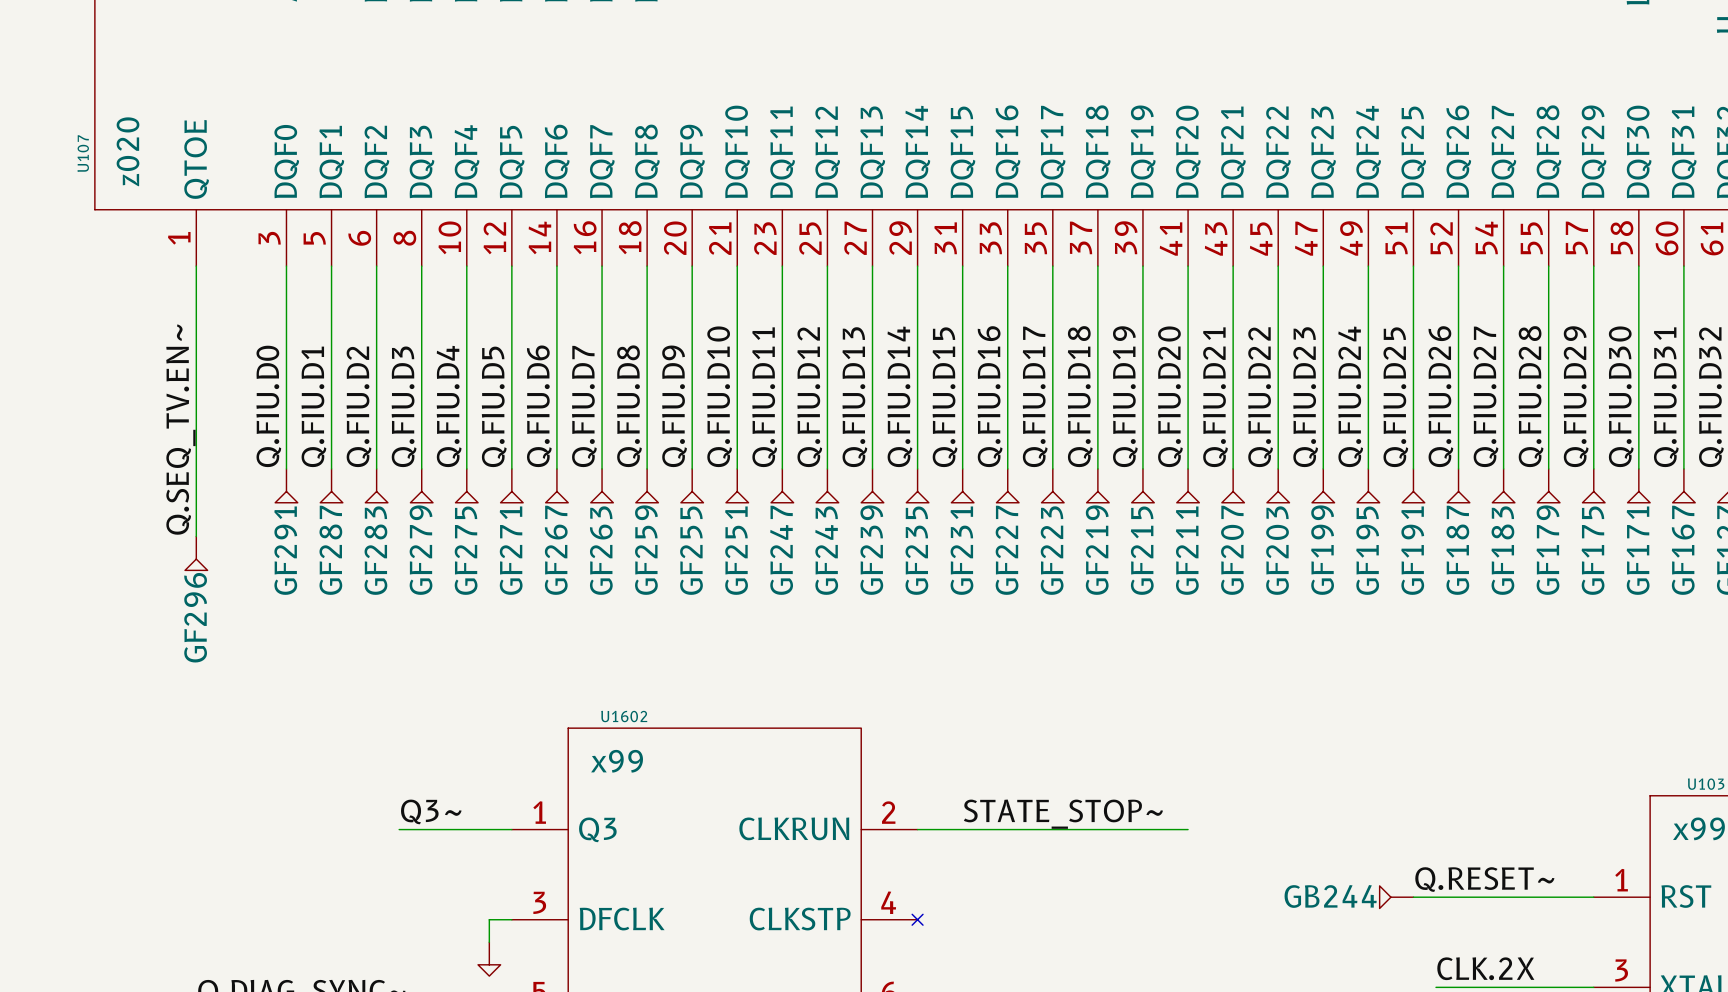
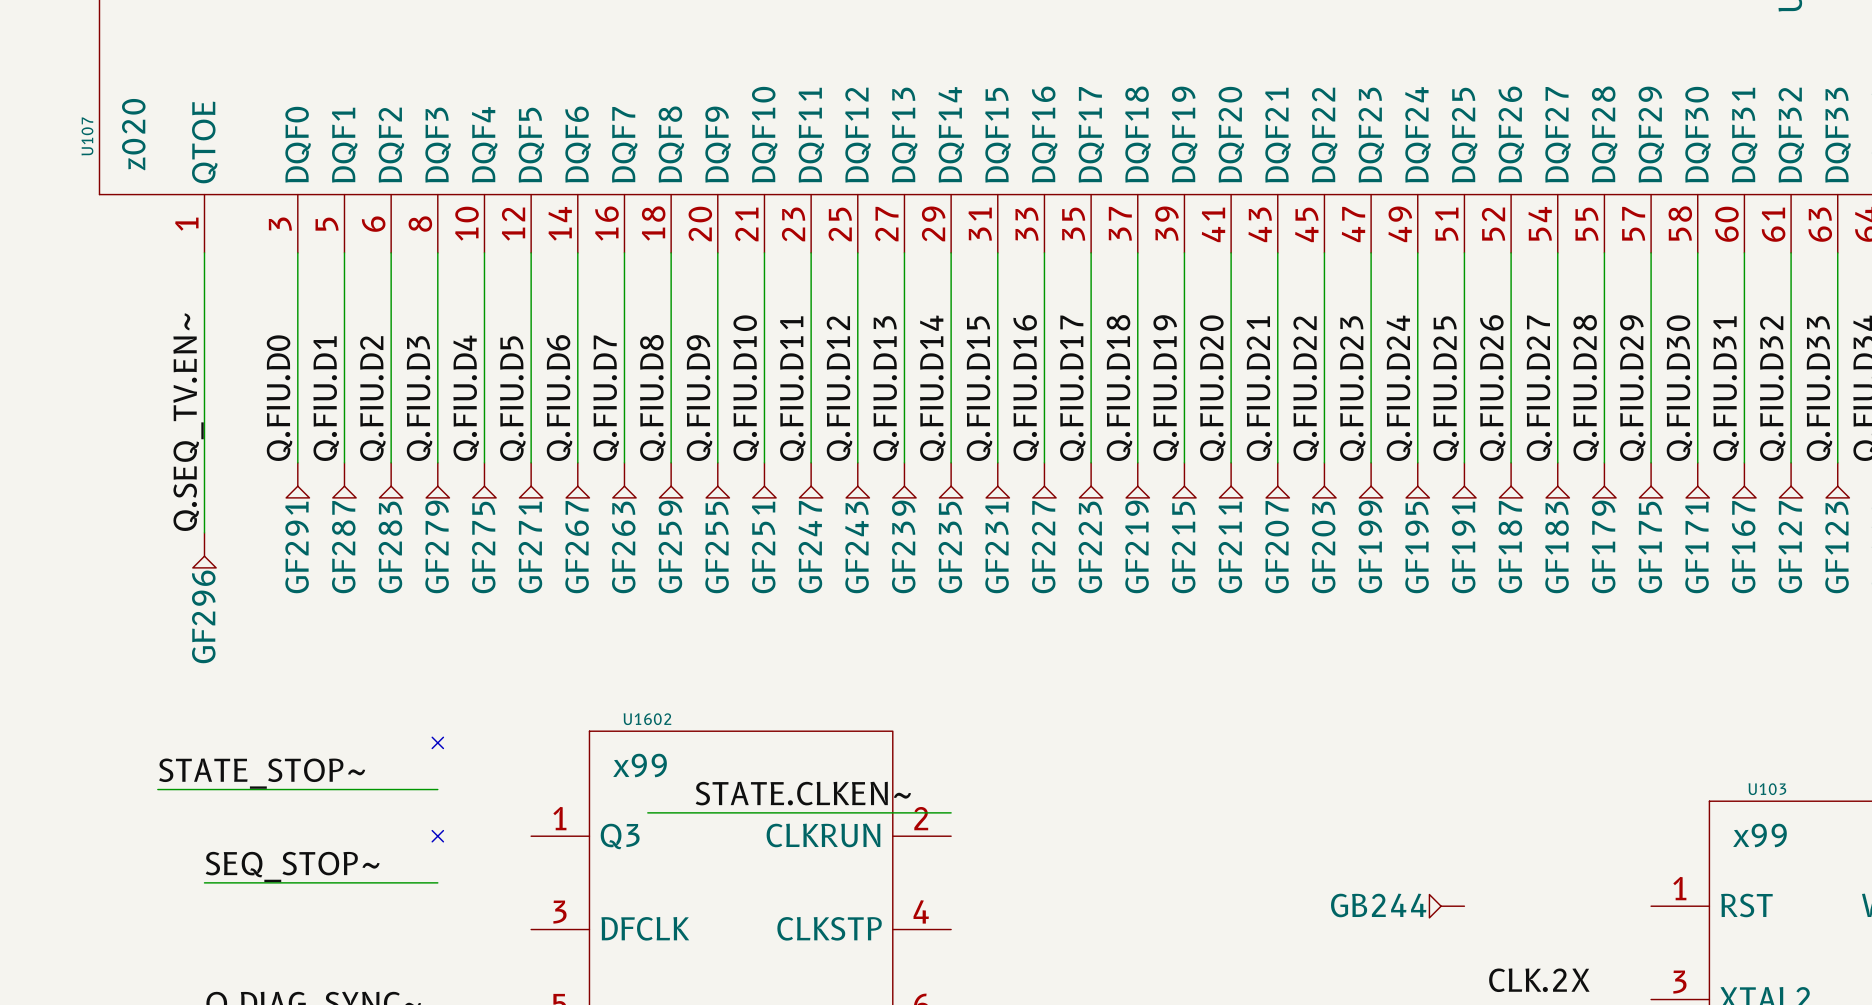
no-connect mark: none -> (437, 742)
label: none -> STATE_STOP~ (262, 773)
wire: none -> (157, 789) (437, 789)
label: none -> STATE.CLKEN~ (803, 793)
wire: none -> (647, 812) (951, 812)
label: Q3~ (431, 811) -> none
label: STATE_STOP~ (1063, 814) -> none
wire: (399, 829) (511, 829) -> none
no-connect mark: none -> (437, 836)
wire: (917, 829) (1188, 829) -> none
label: none -> SEQ_STOP~ (292, 866)
wire: none -> (204, 882) (437, 882)
label: Q.RESET~ (1484, 879) -> none
wire: (1413, 897) (1593, 897) -> none
wire: (511, 919) (489, 919) (489, 942) -> none
no-connect mark: (917, 919) -> none
power symbol: (489, 959) -> none
wire: (1435, 987) (1593, 987) -> none

